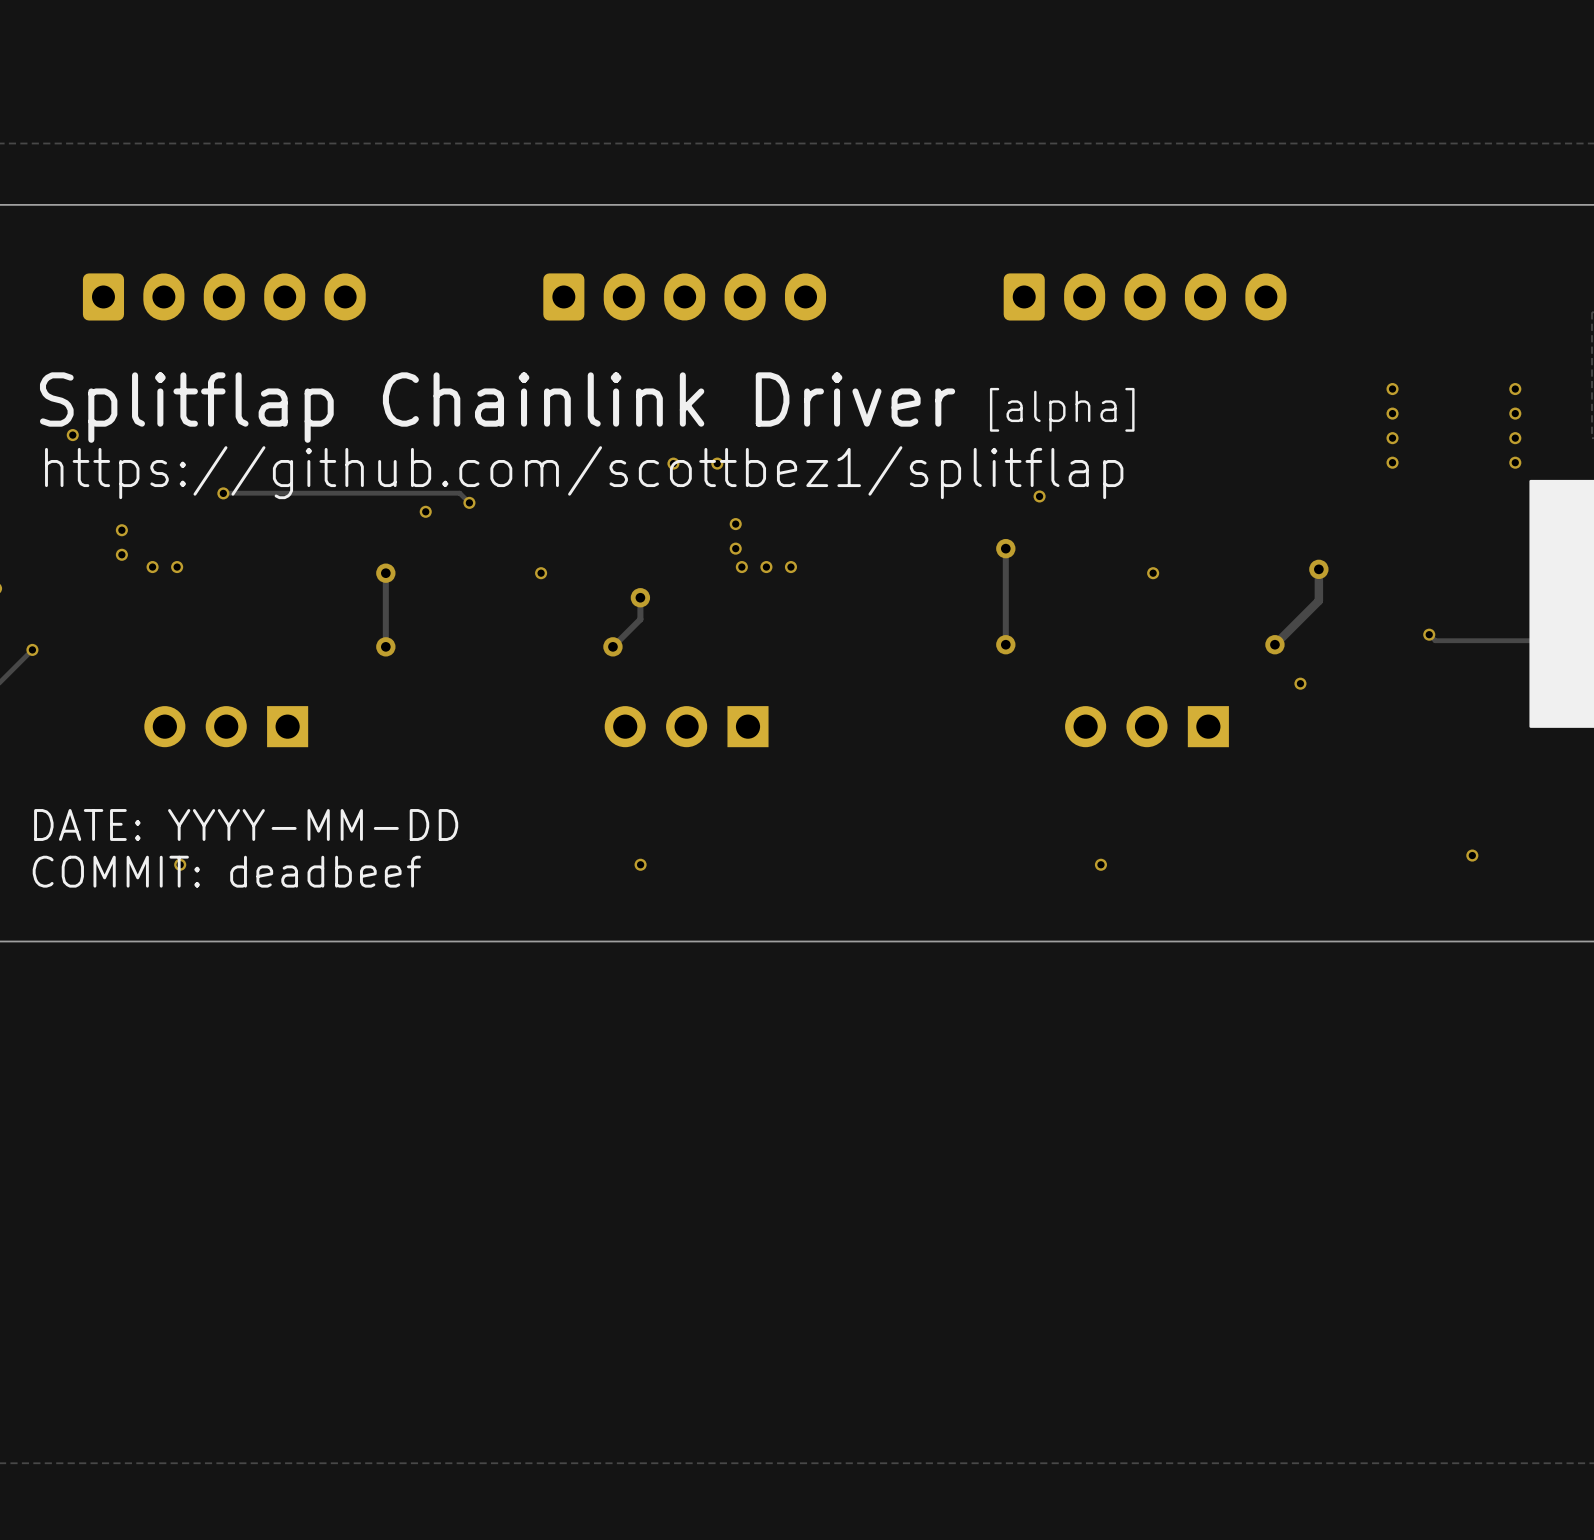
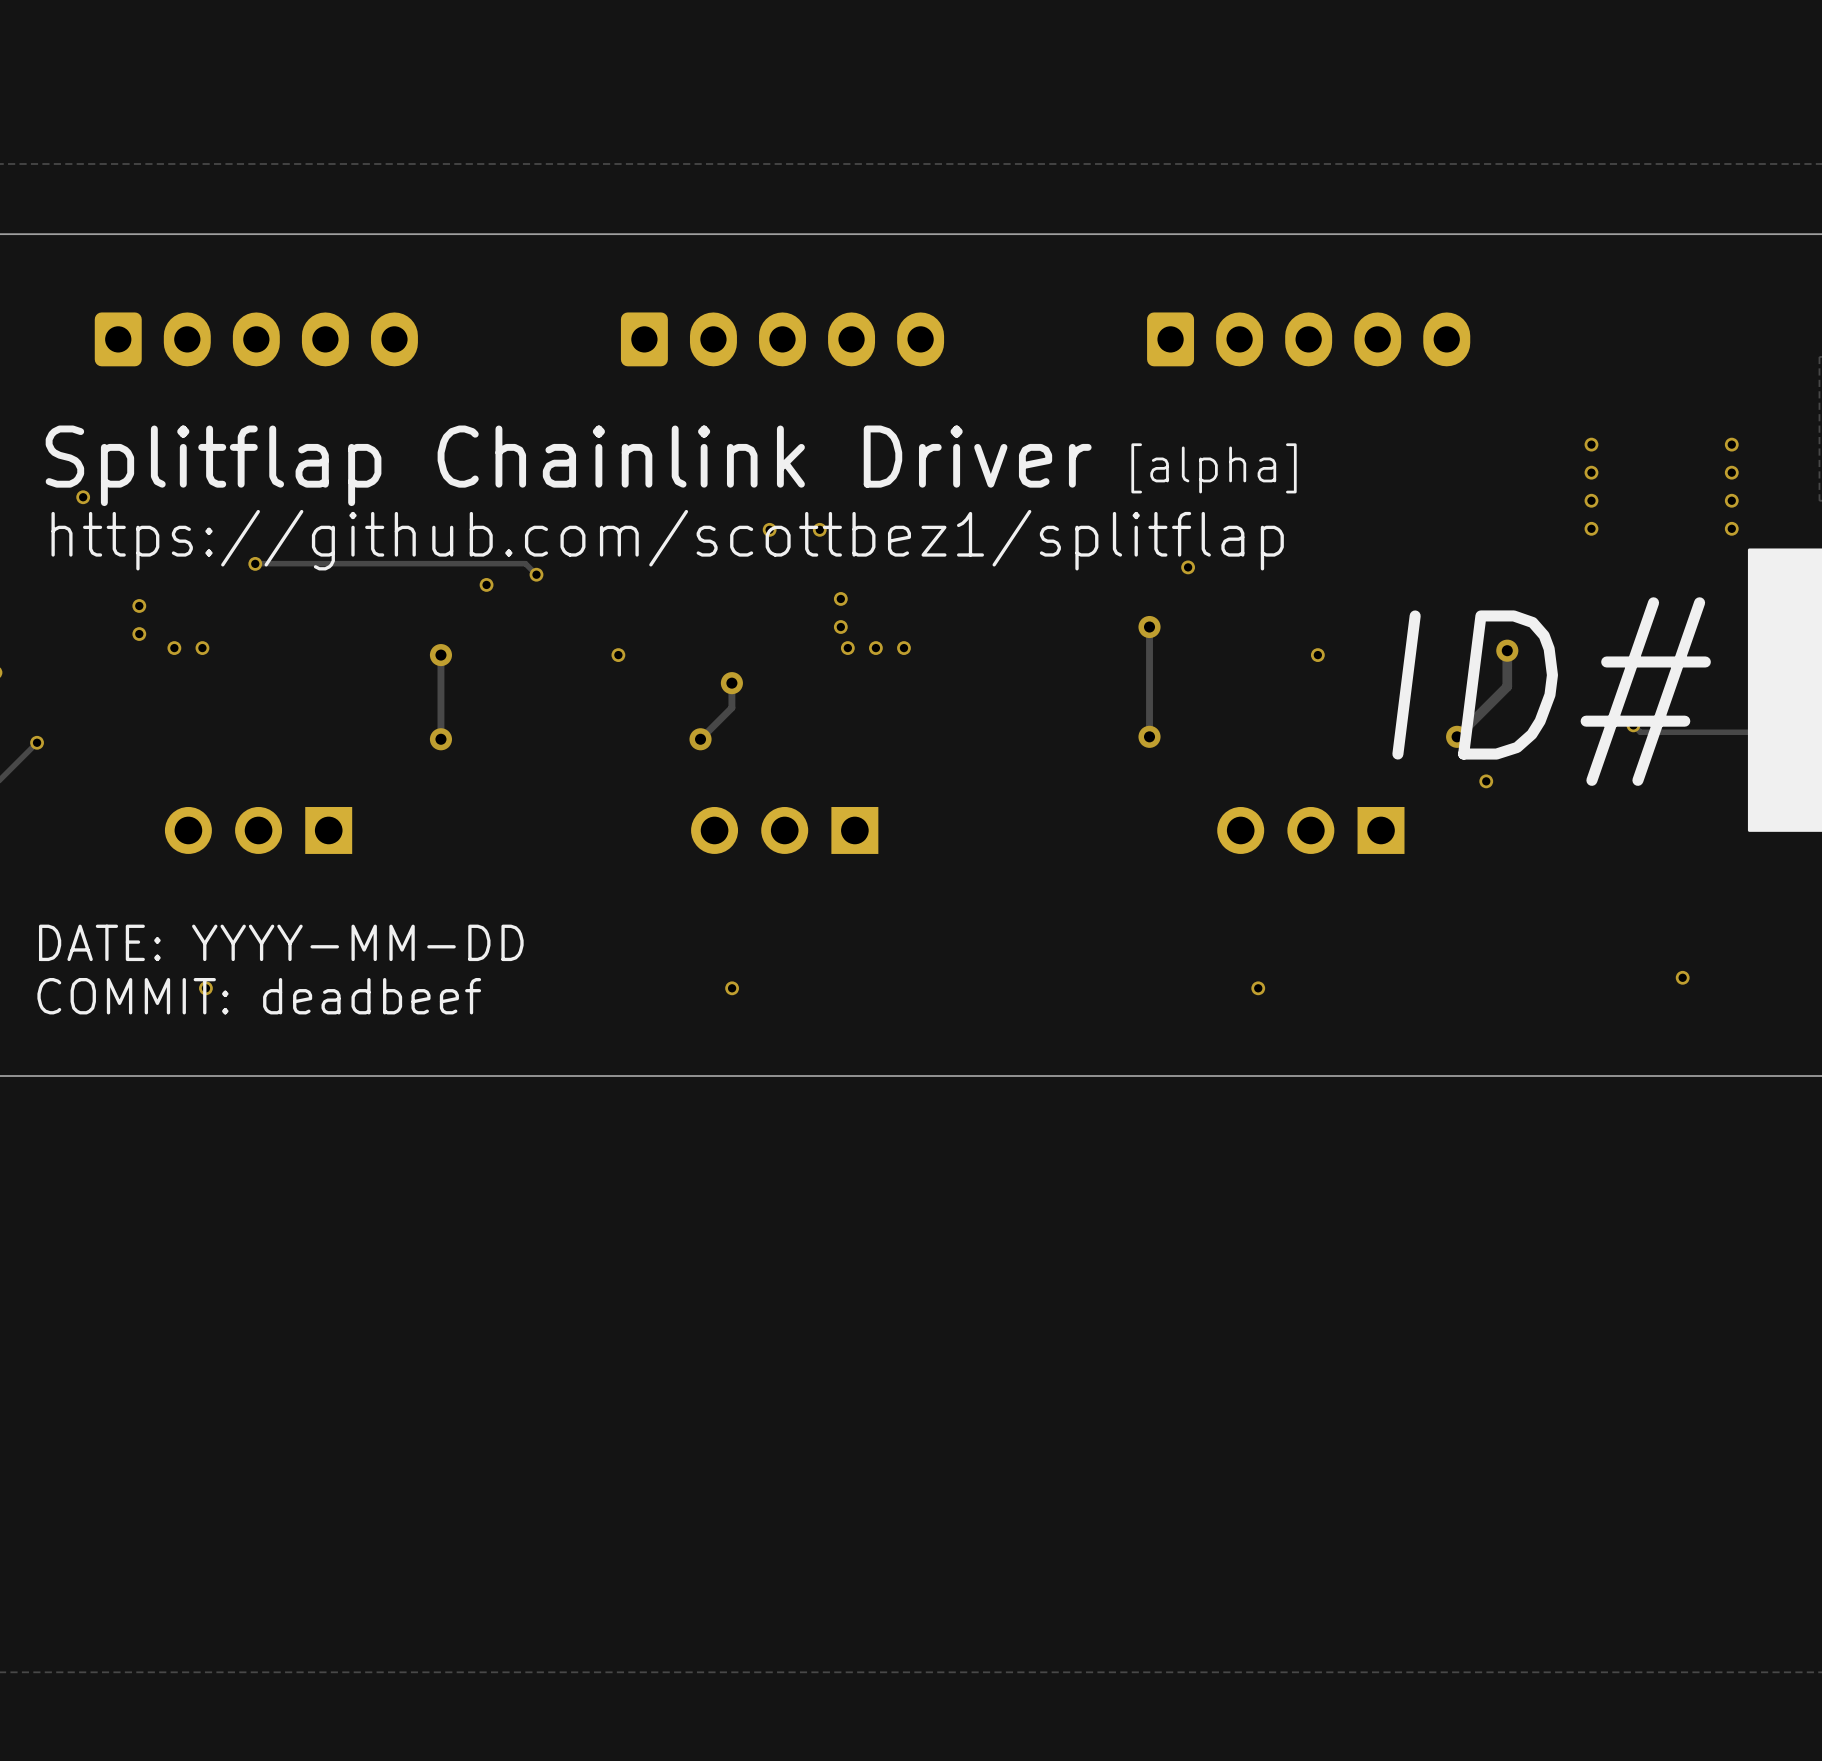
text: none -> ID# (1551, 691)

